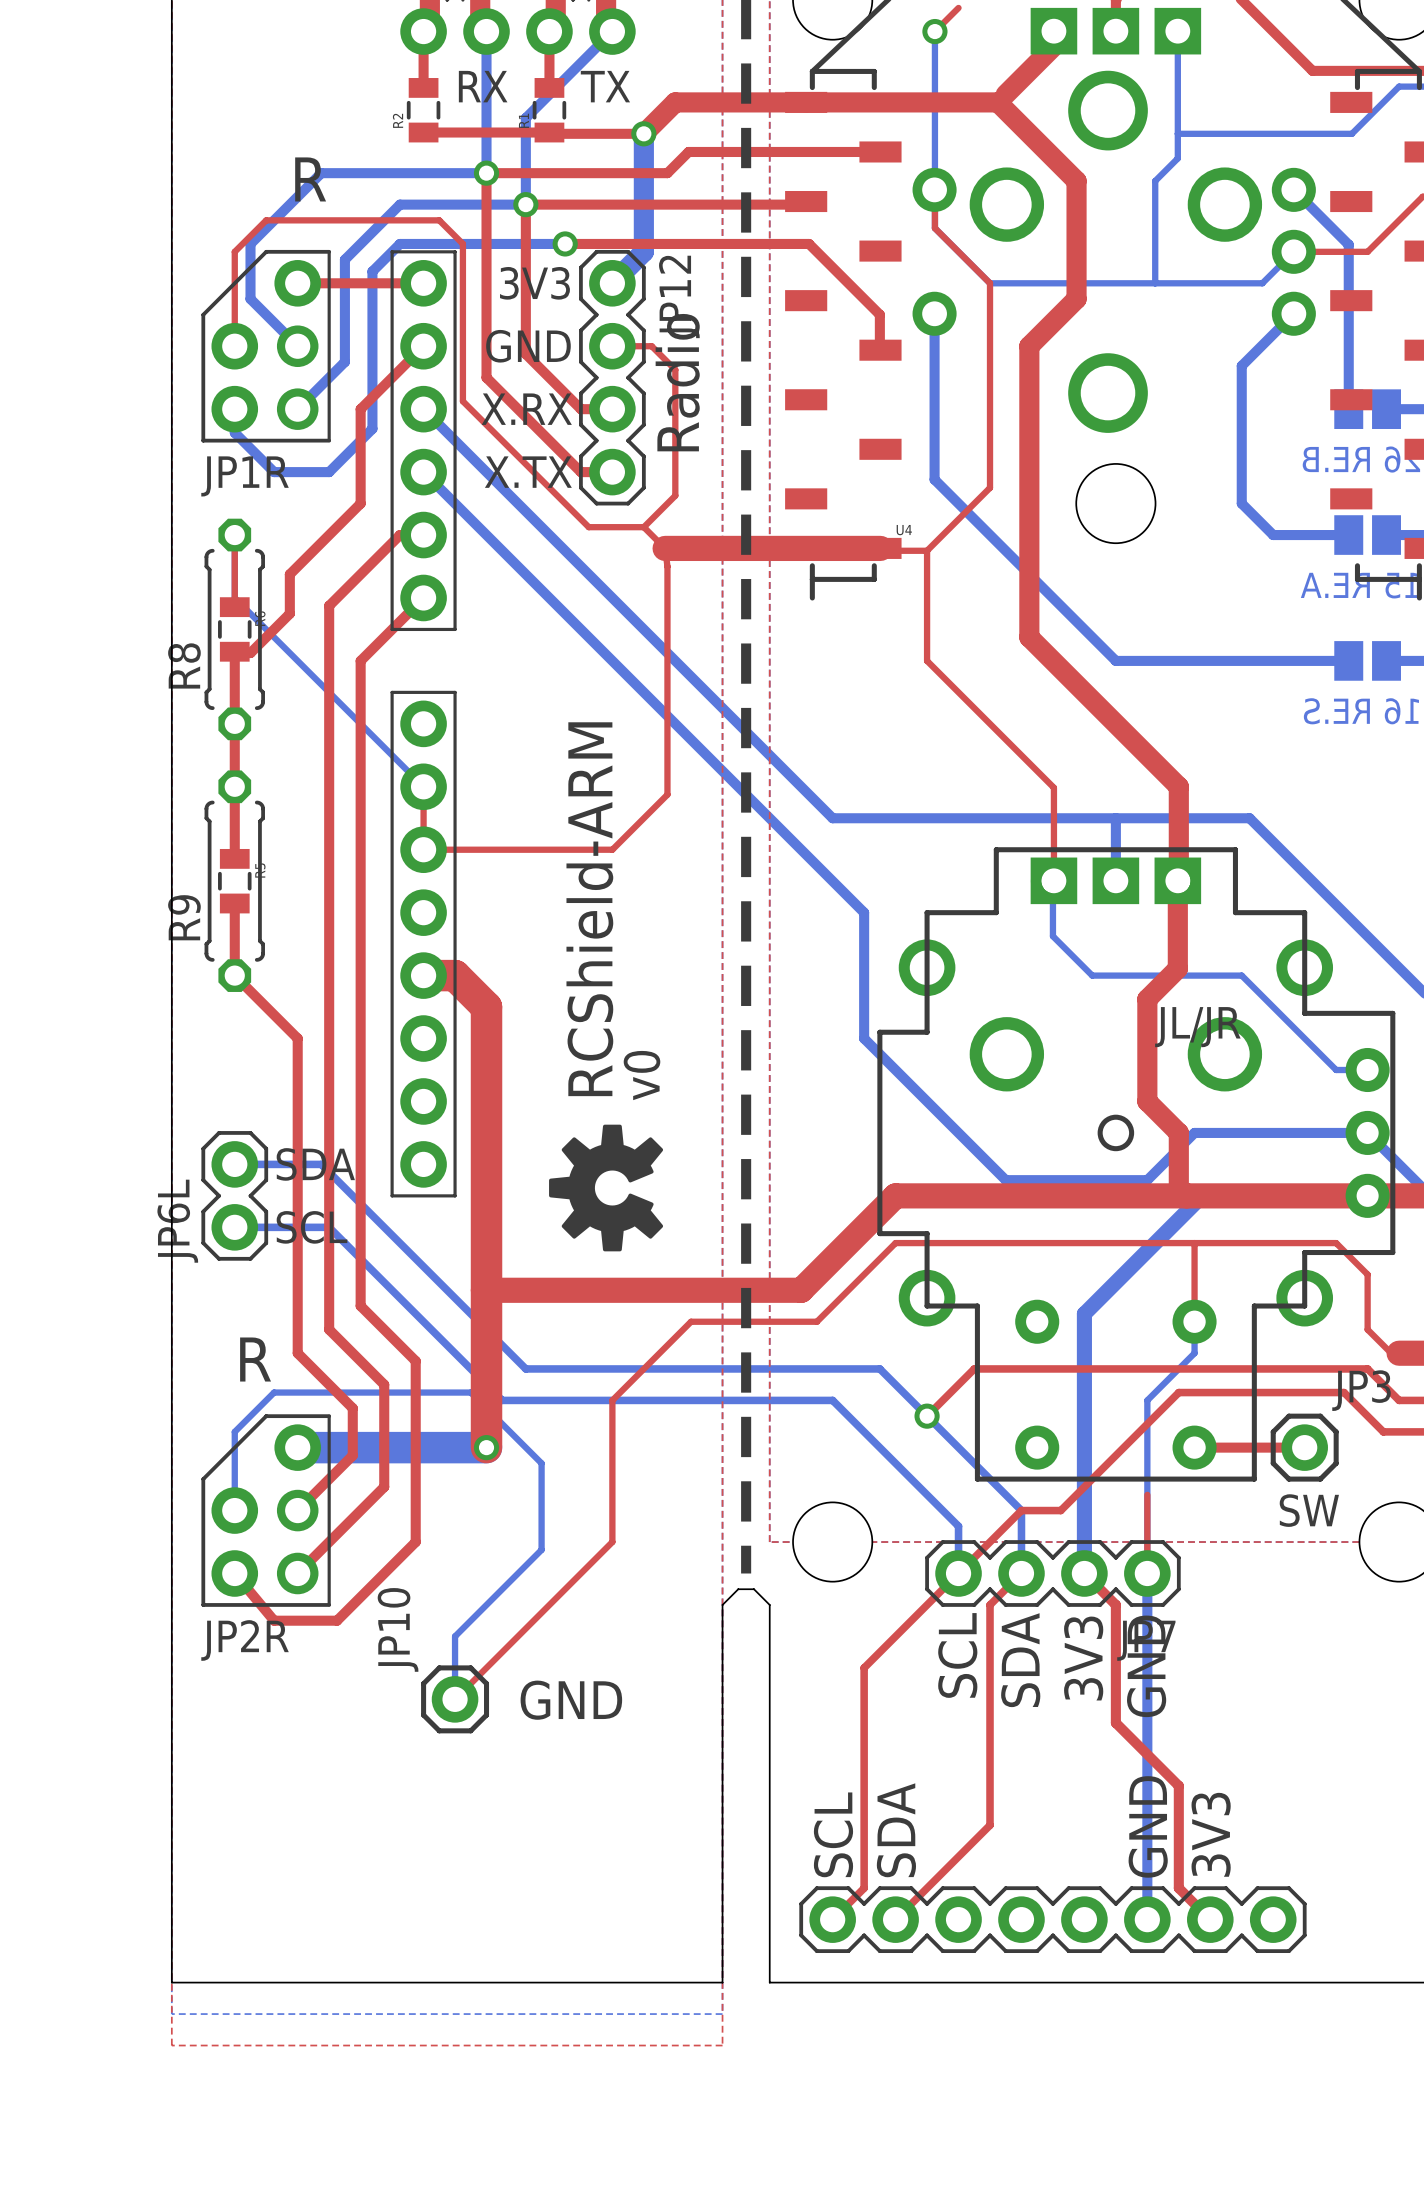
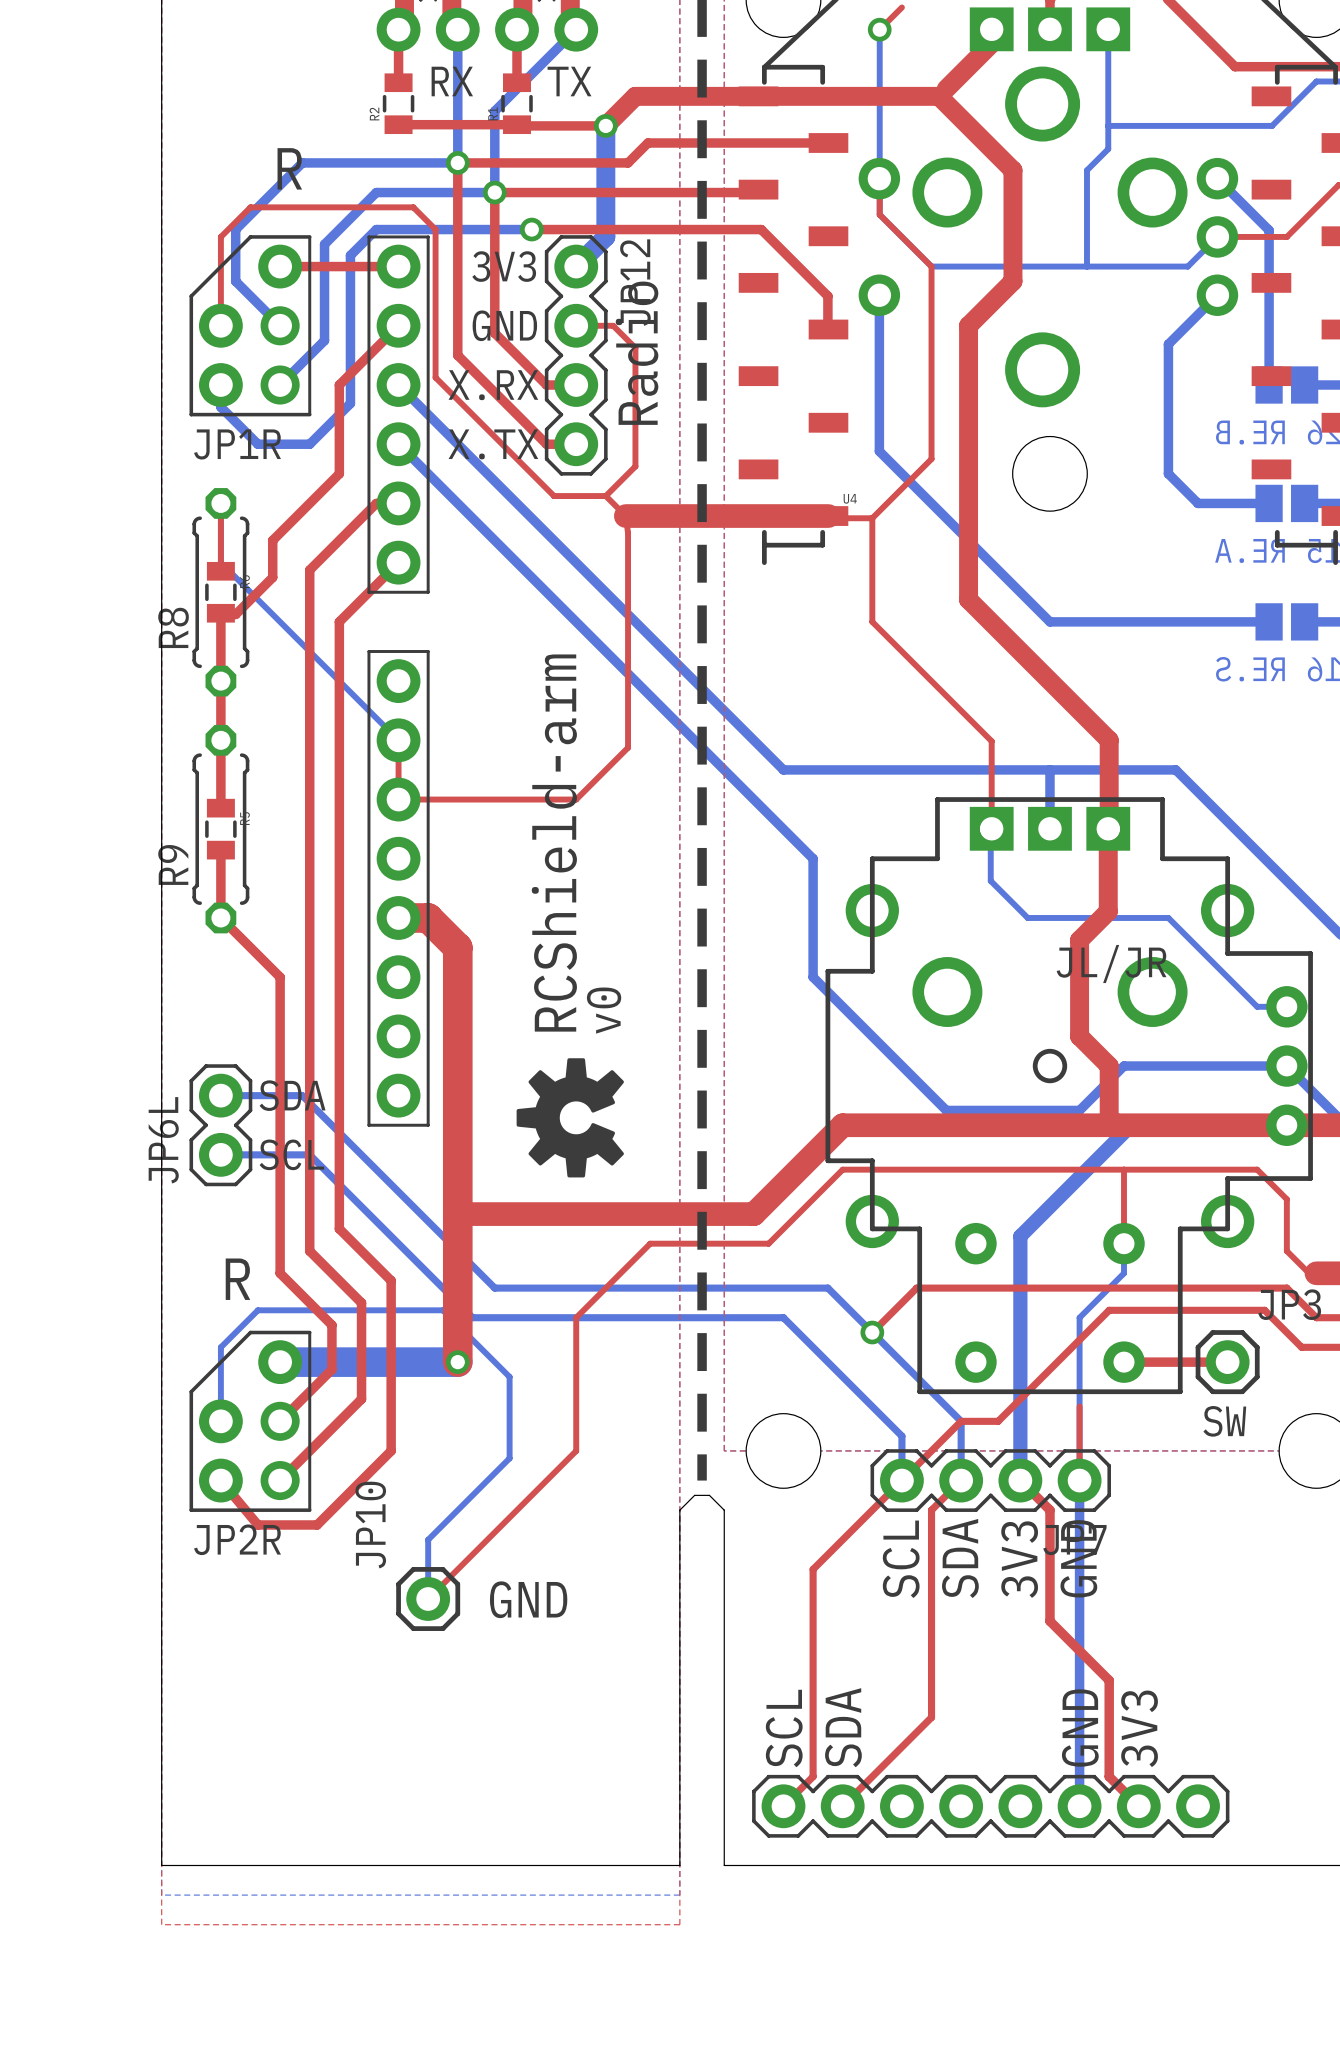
text: RCShield-ARM (589, 909) -> RCShield-arm (554, 843)

